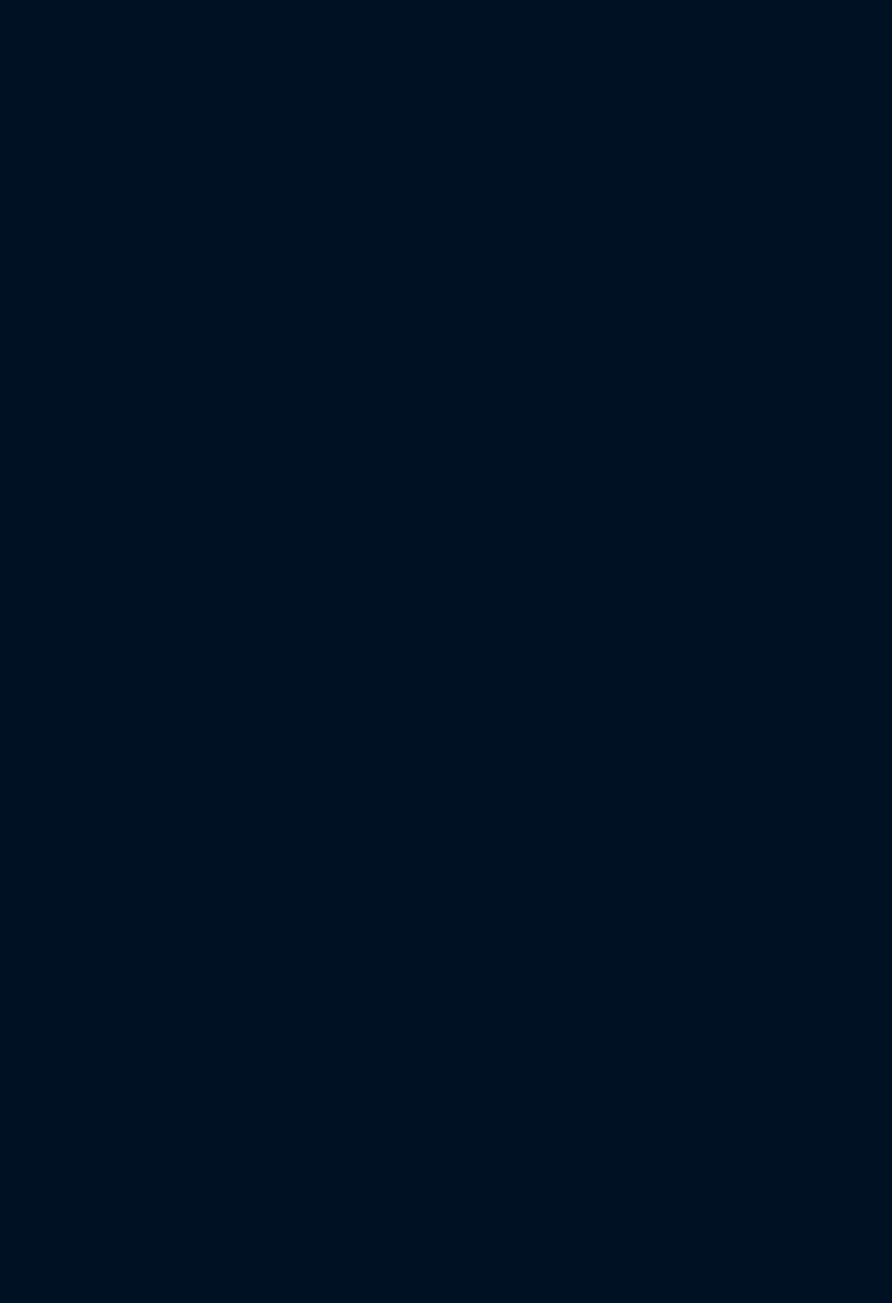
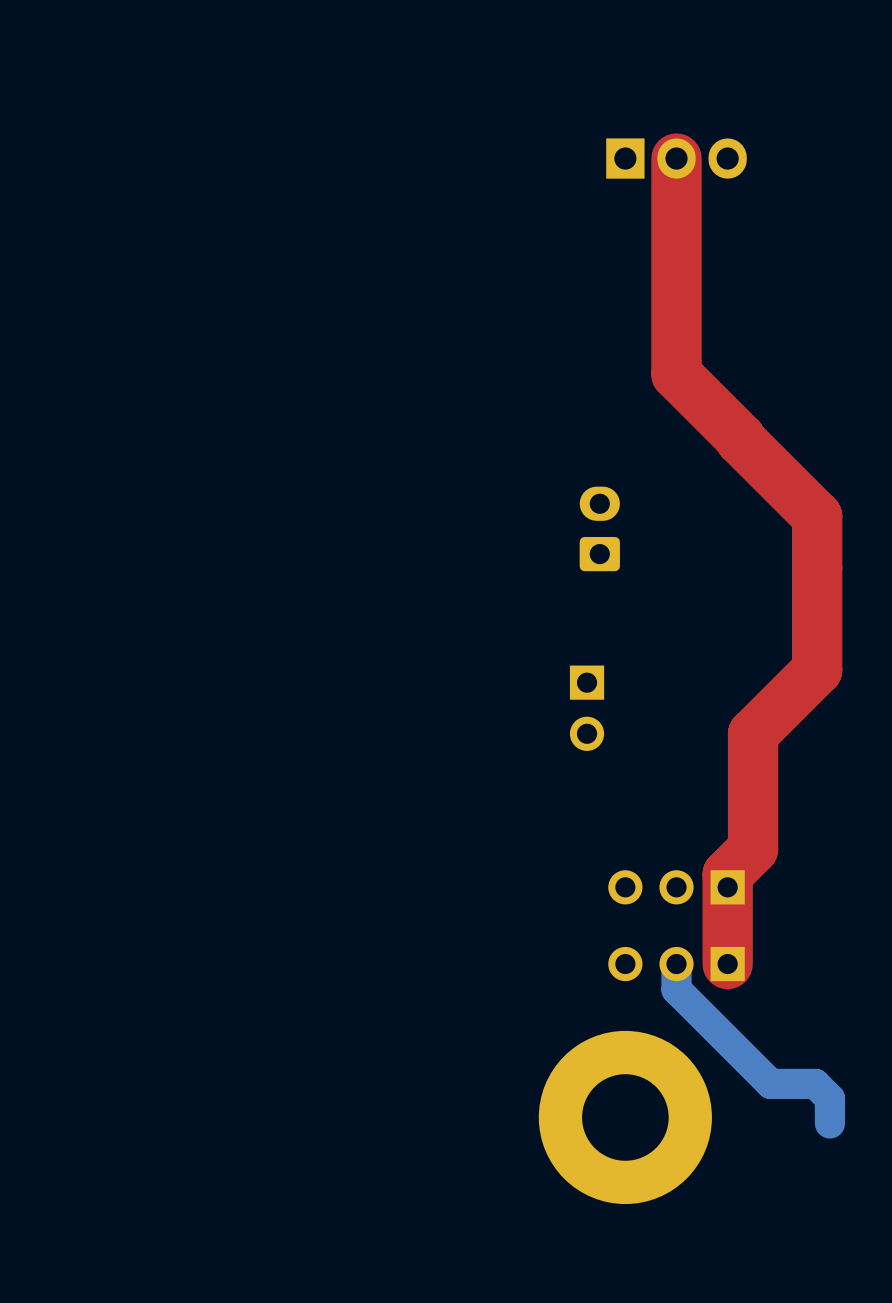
top track: none -> (676, 158) (676, 374) (817, 516) (817, 669) (753, 734) (753, 848) (727, 874) (727, 964)
part: none -> (676, 158)
part: none -> (599, 528)
part: none -> (587, 708)
part: none -> (676, 887)
bottom track: none -> (676, 964) (676, 989) (770, 1083) (815, 1083) (829, 1098) (829, 1123)
part: none -> (676, 964)
part: none -> (625, 1117)

